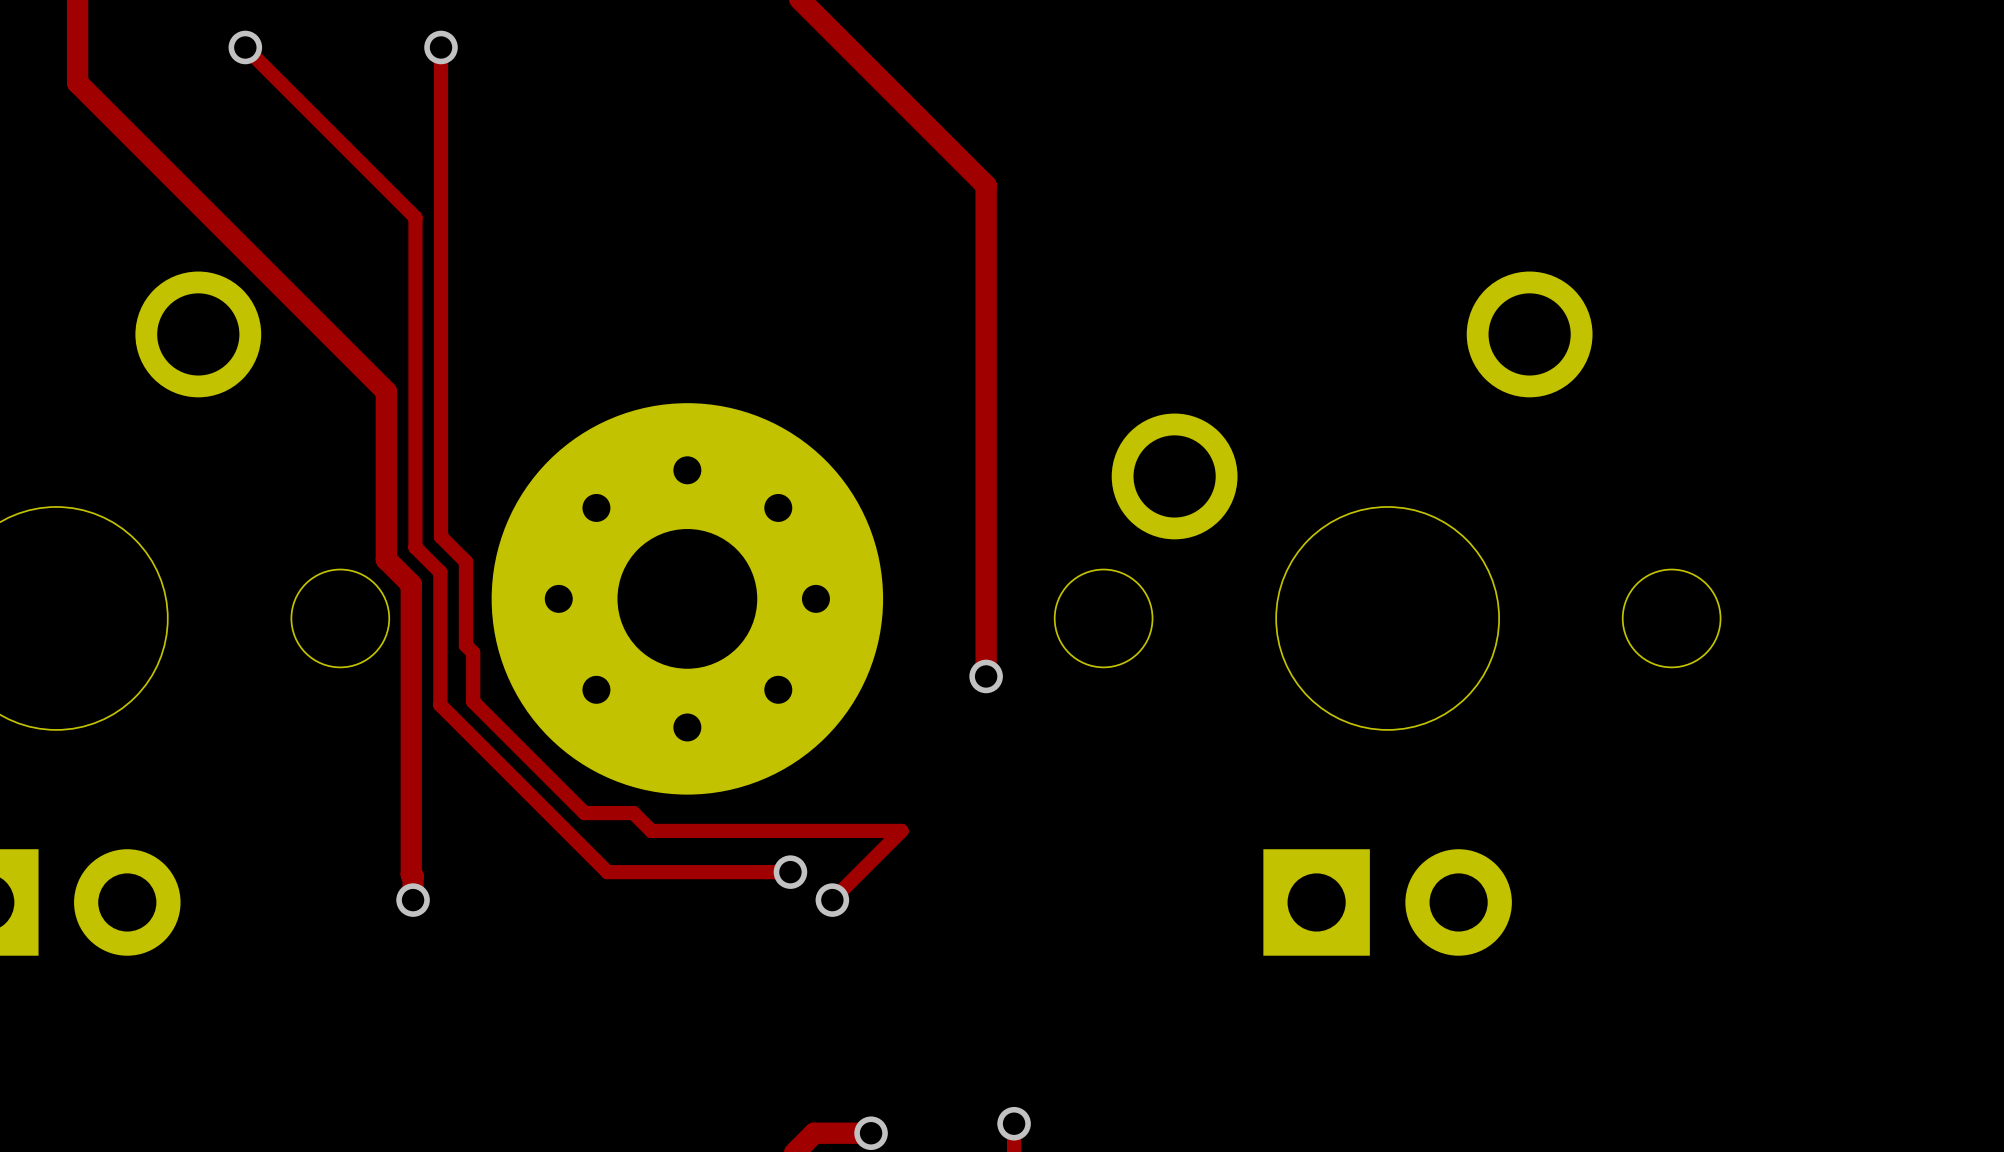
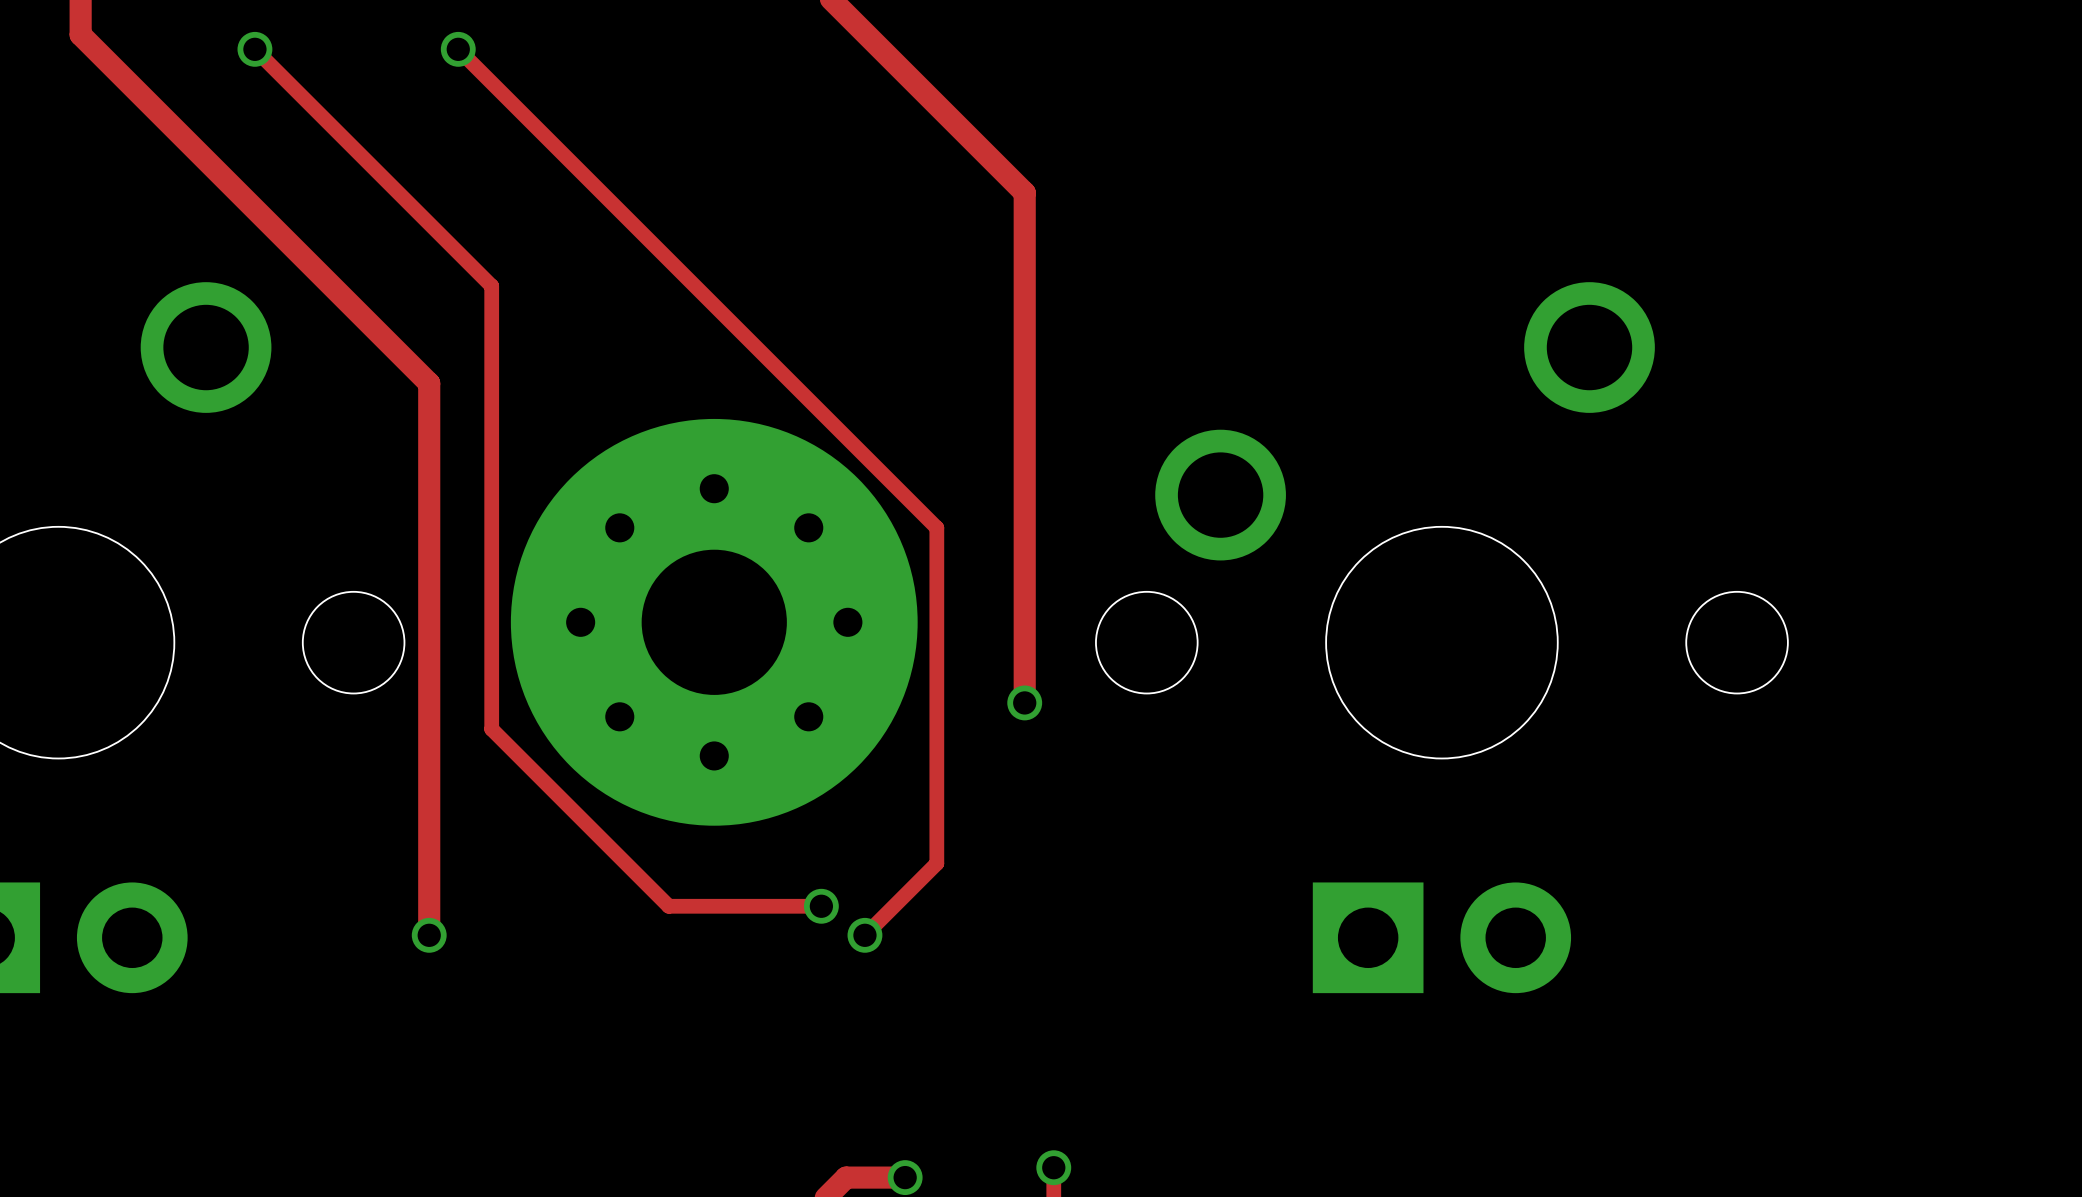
track: (77, 33) (77, 82) (386, 391) (386, 559) (411, 584) (411, 874) (413, 876) -> (80, 34) (429, 383) (429, 910)
track: (441, 47) (441, 536) (465, 561) (465, 645) (473, 652) -> (431, 226) (491, 286) (491, 678)
track: none -> (458, 49) (936, 527) (936, 863)
track: (415, 217) (415, 547) (440, 572) (440, 705) (607, 872) (643, 872) -> none
track: (584, 813) (633, 813) (651, 830) (901, 830) -> (607, 844) (668, 906)

